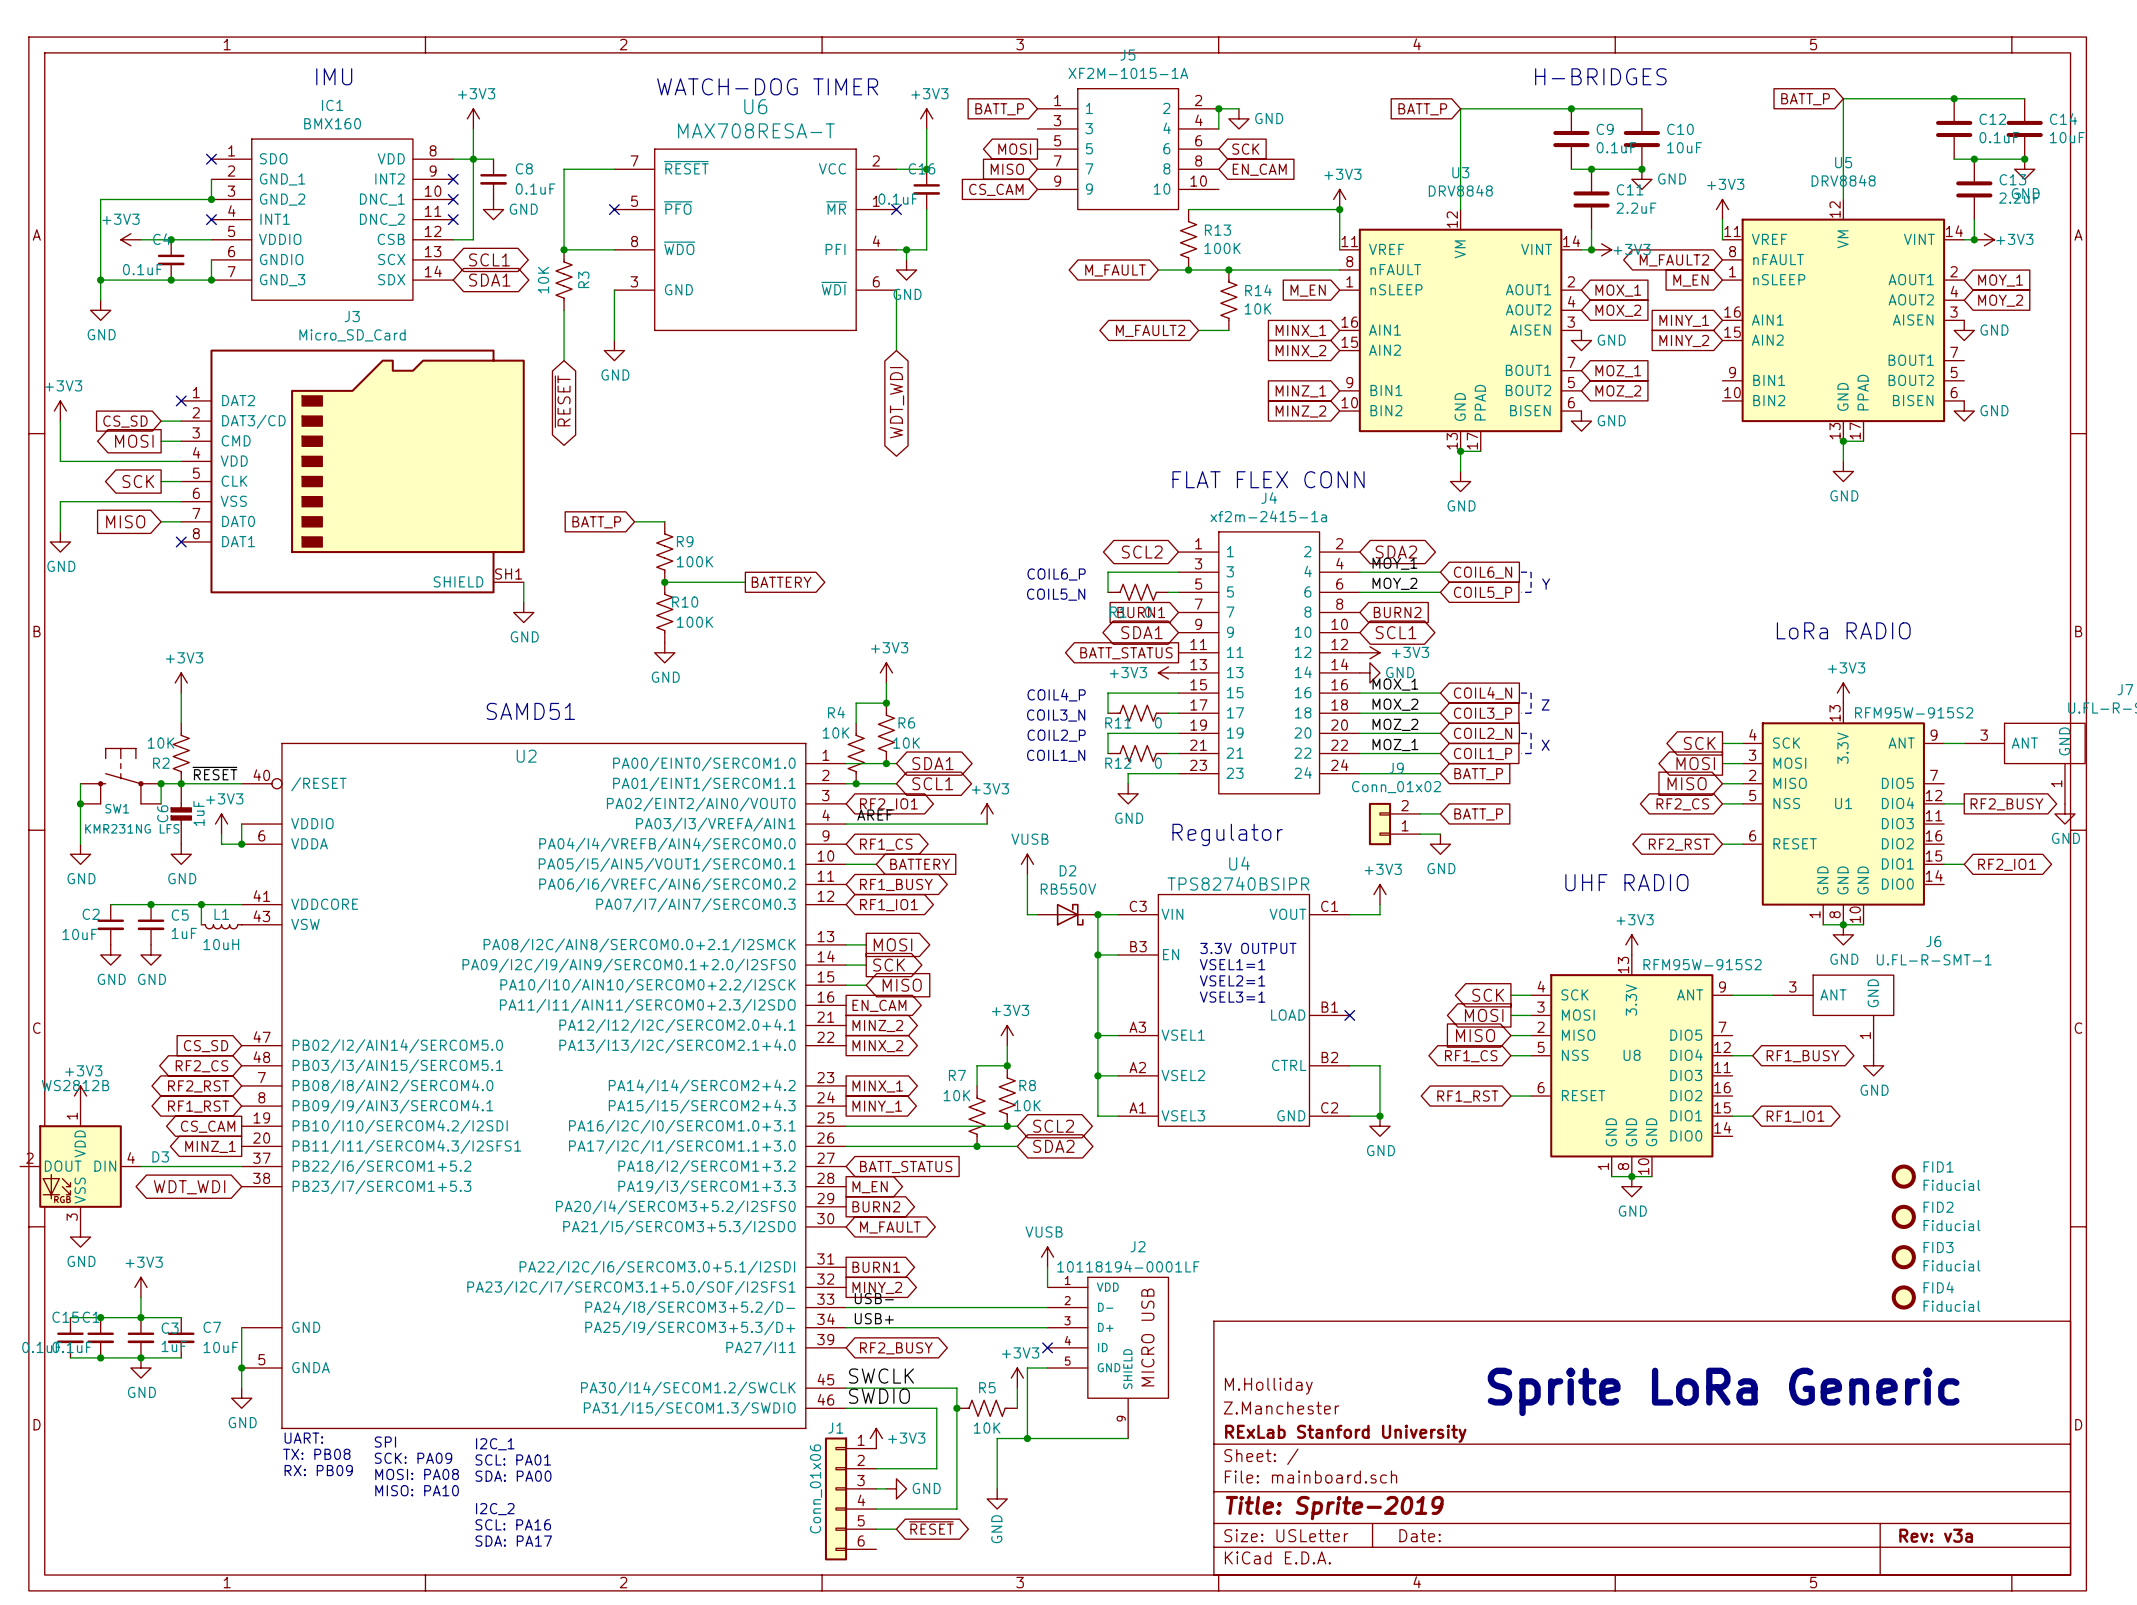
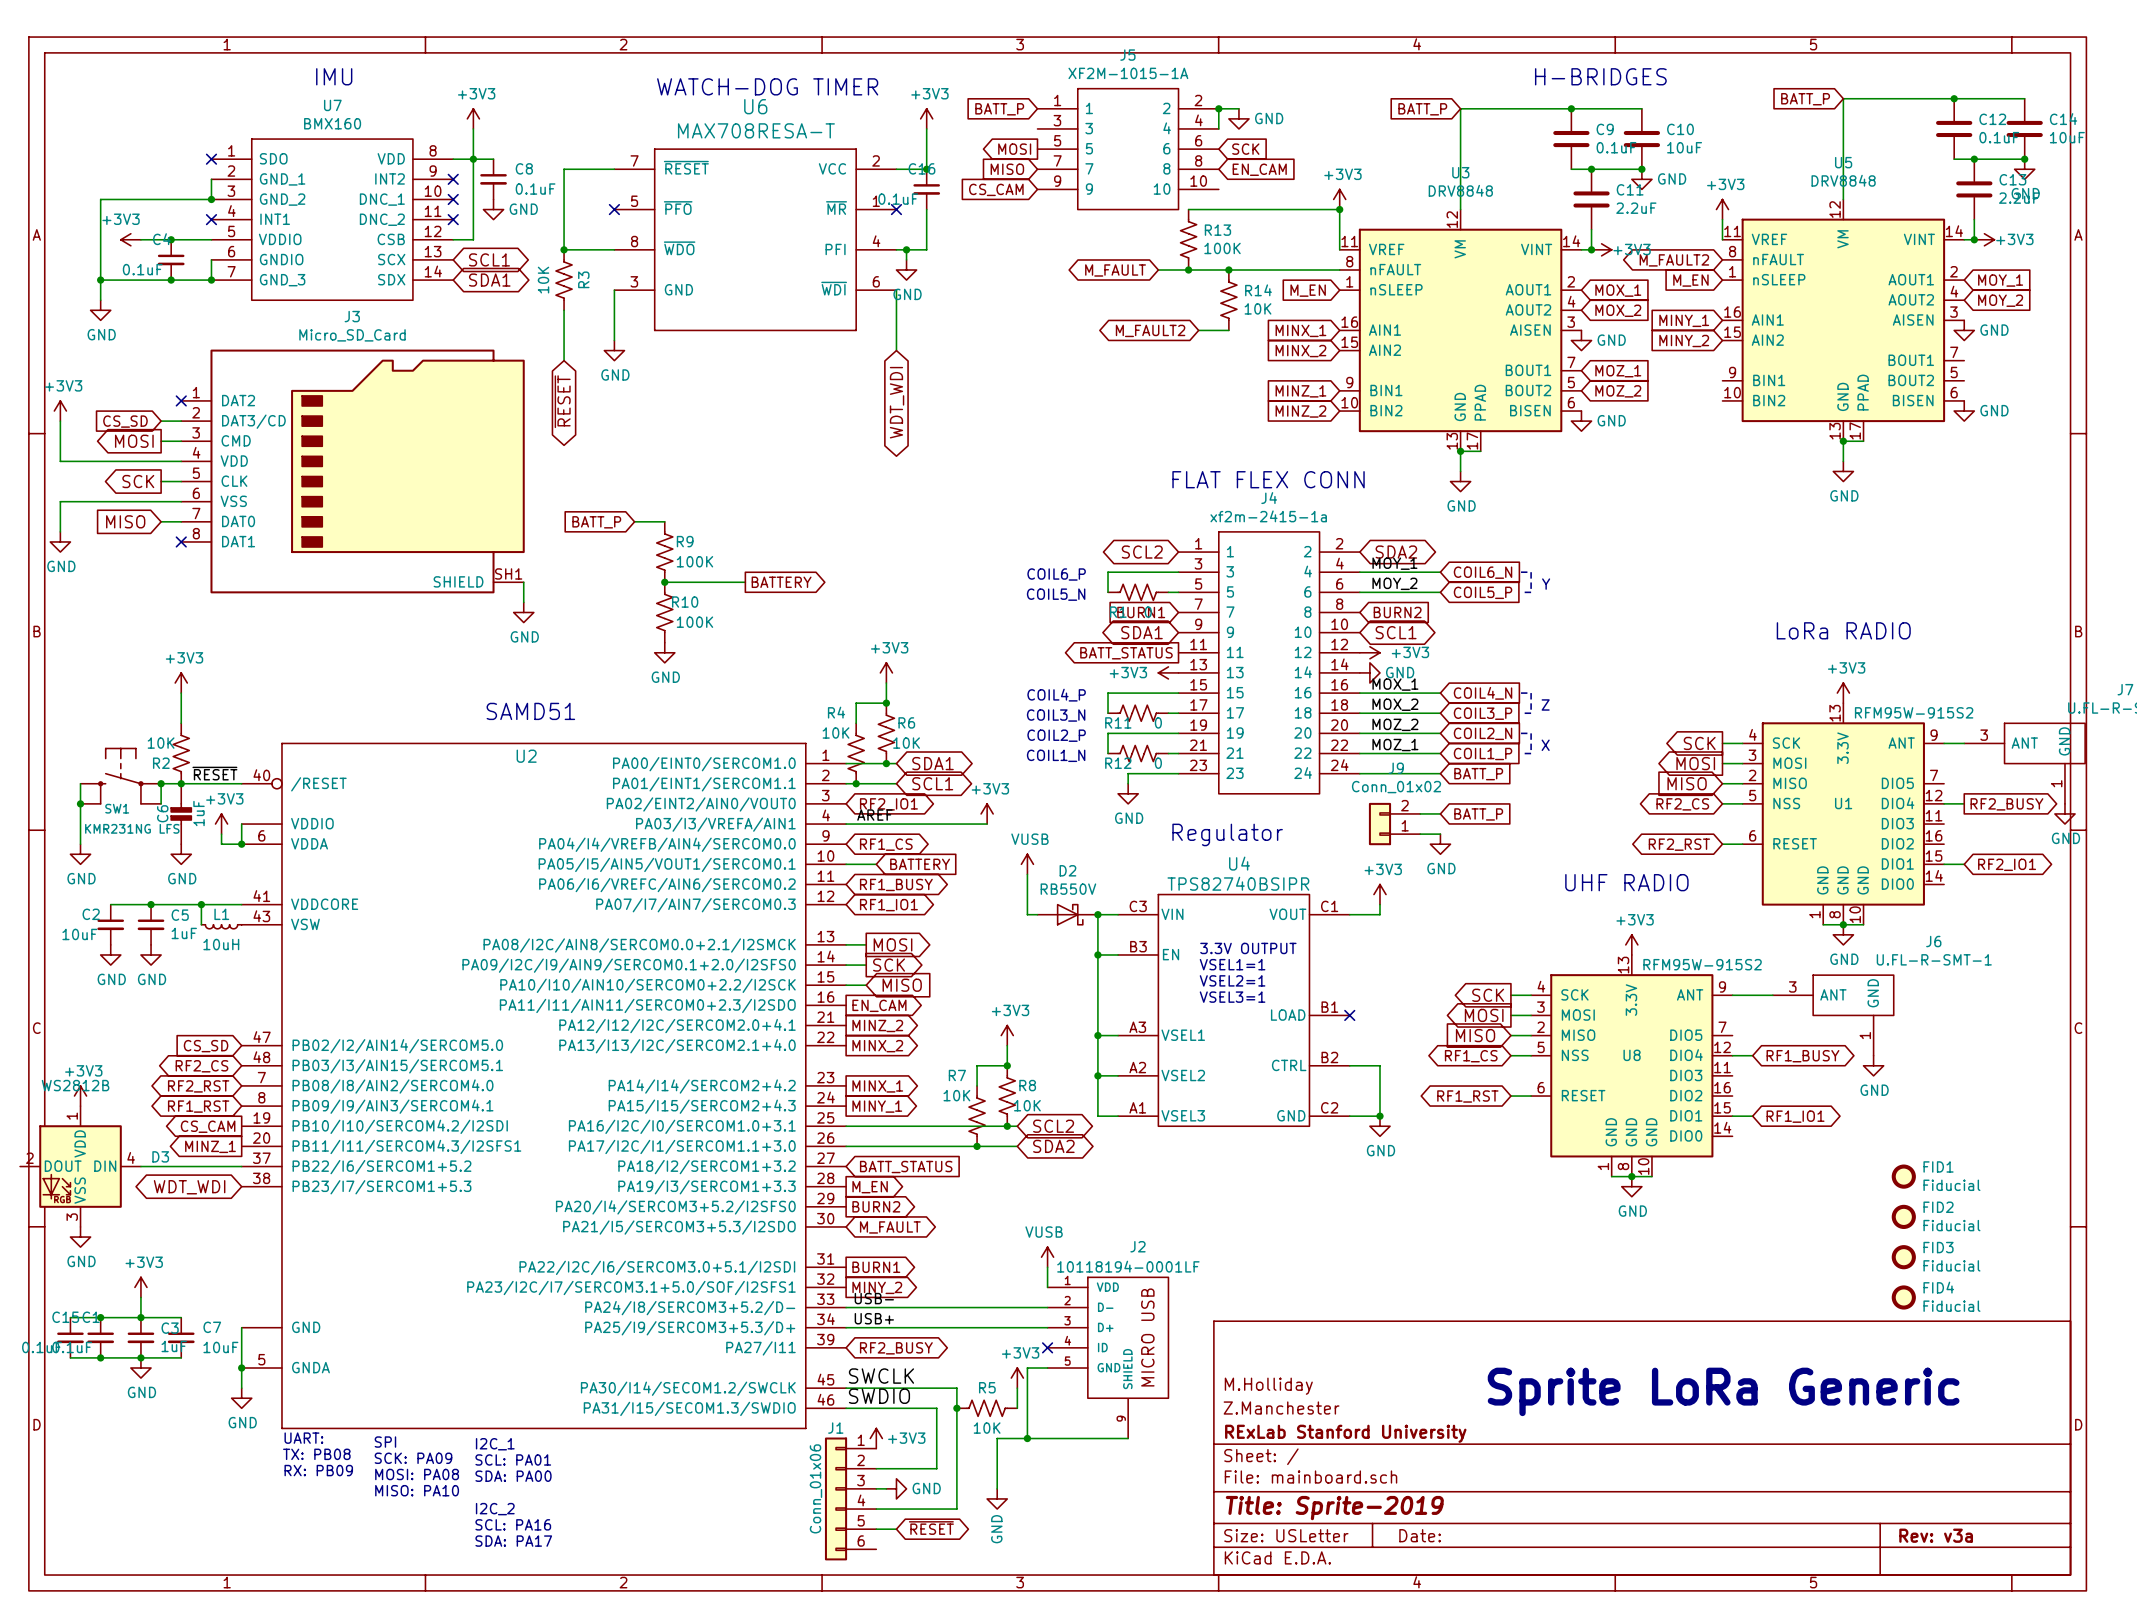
IC1 name: IC1 (332, 105) -> U7 (332, 105)

